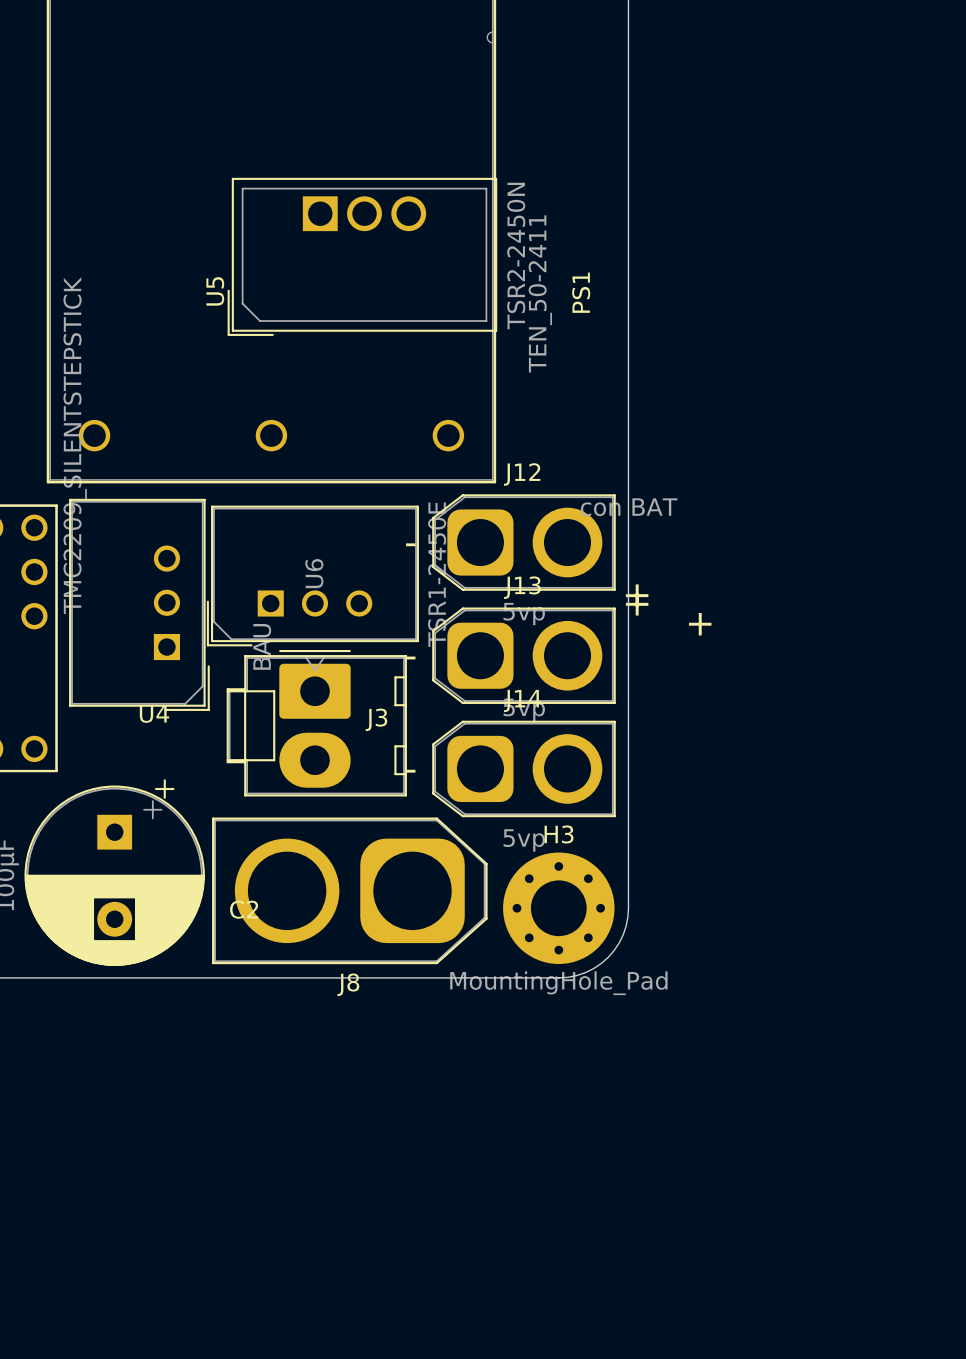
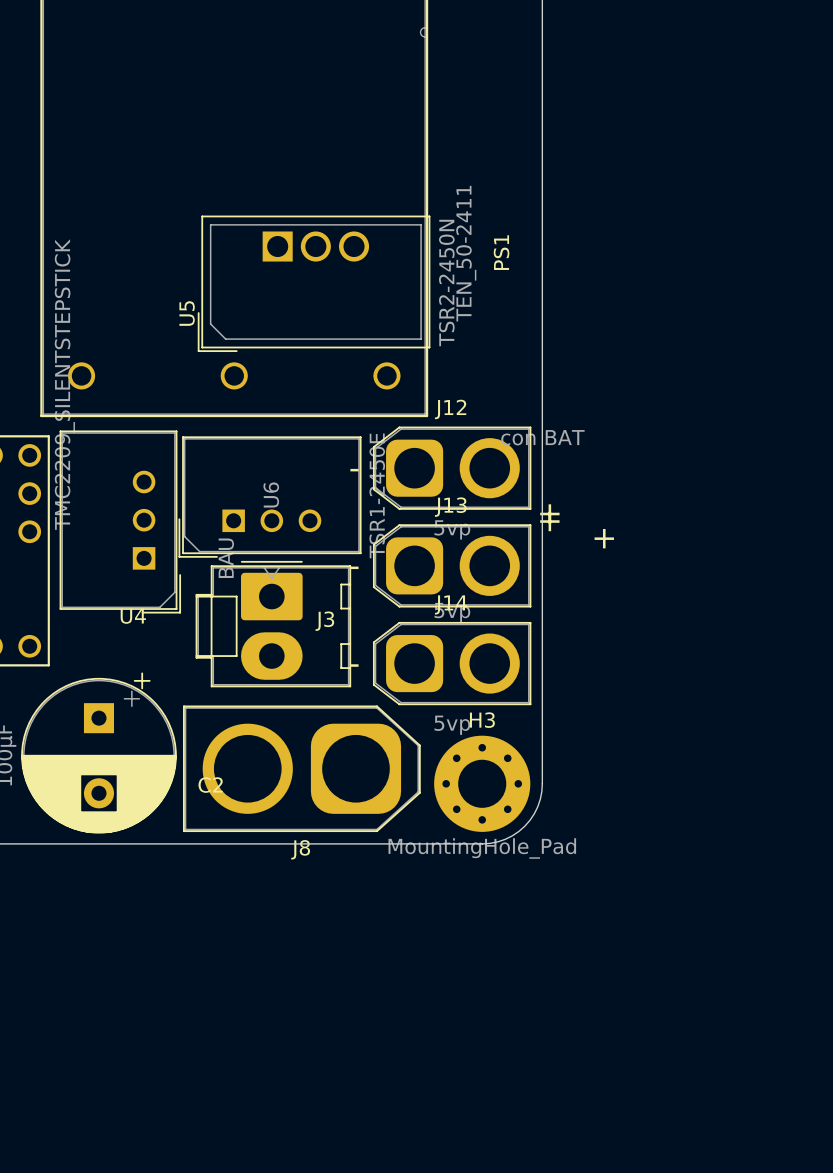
U5 position: (362, 256) -> (314, 283)

